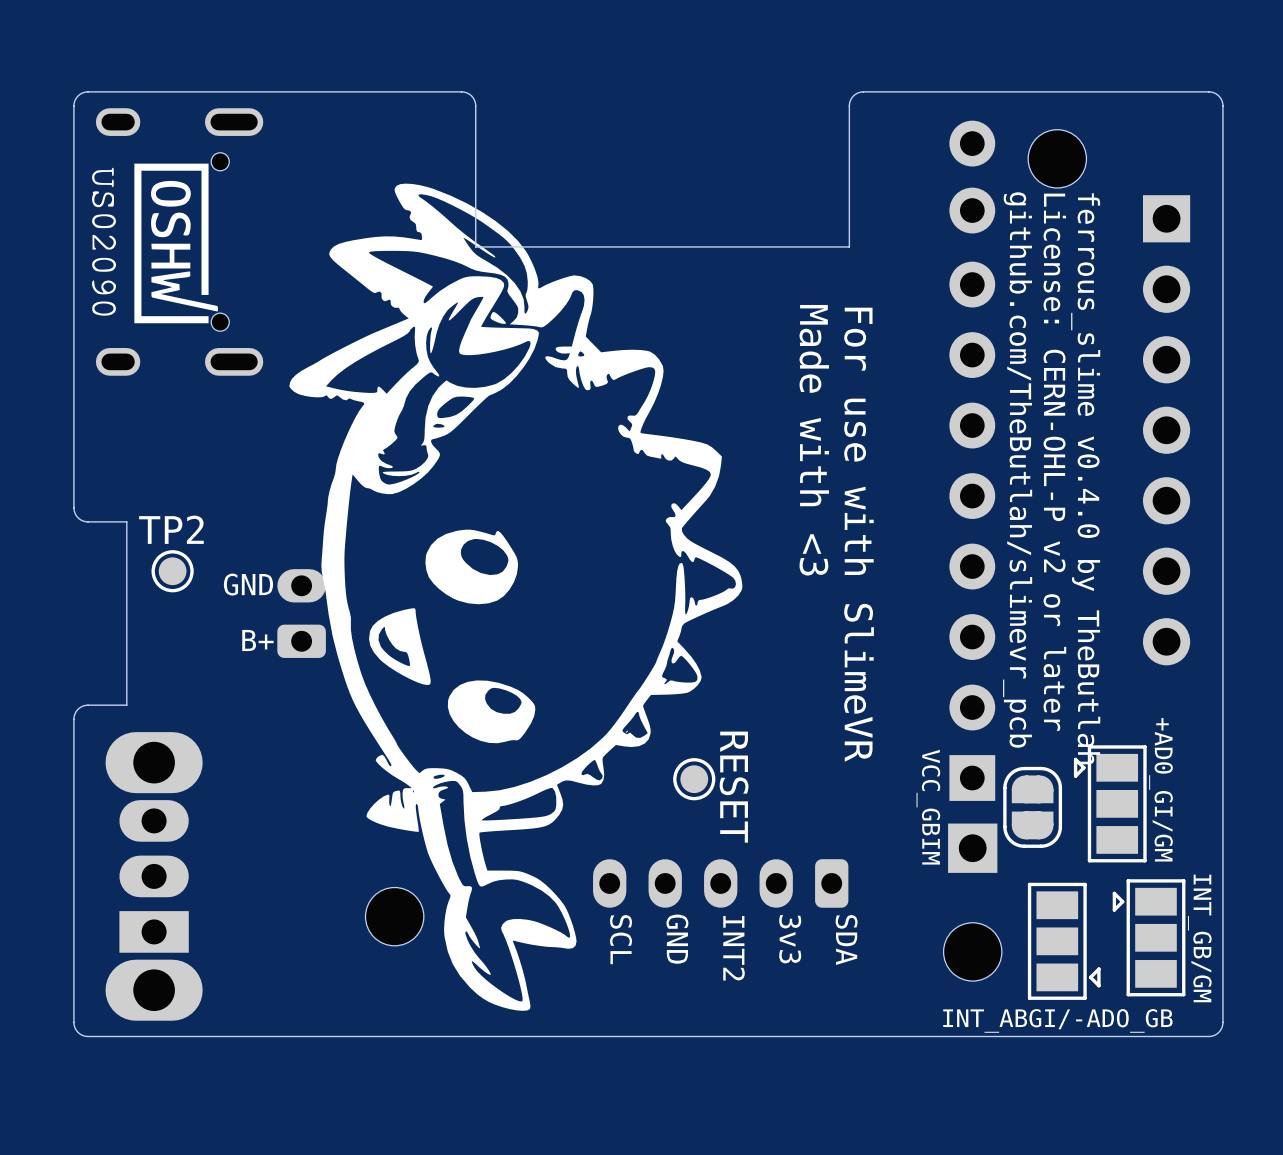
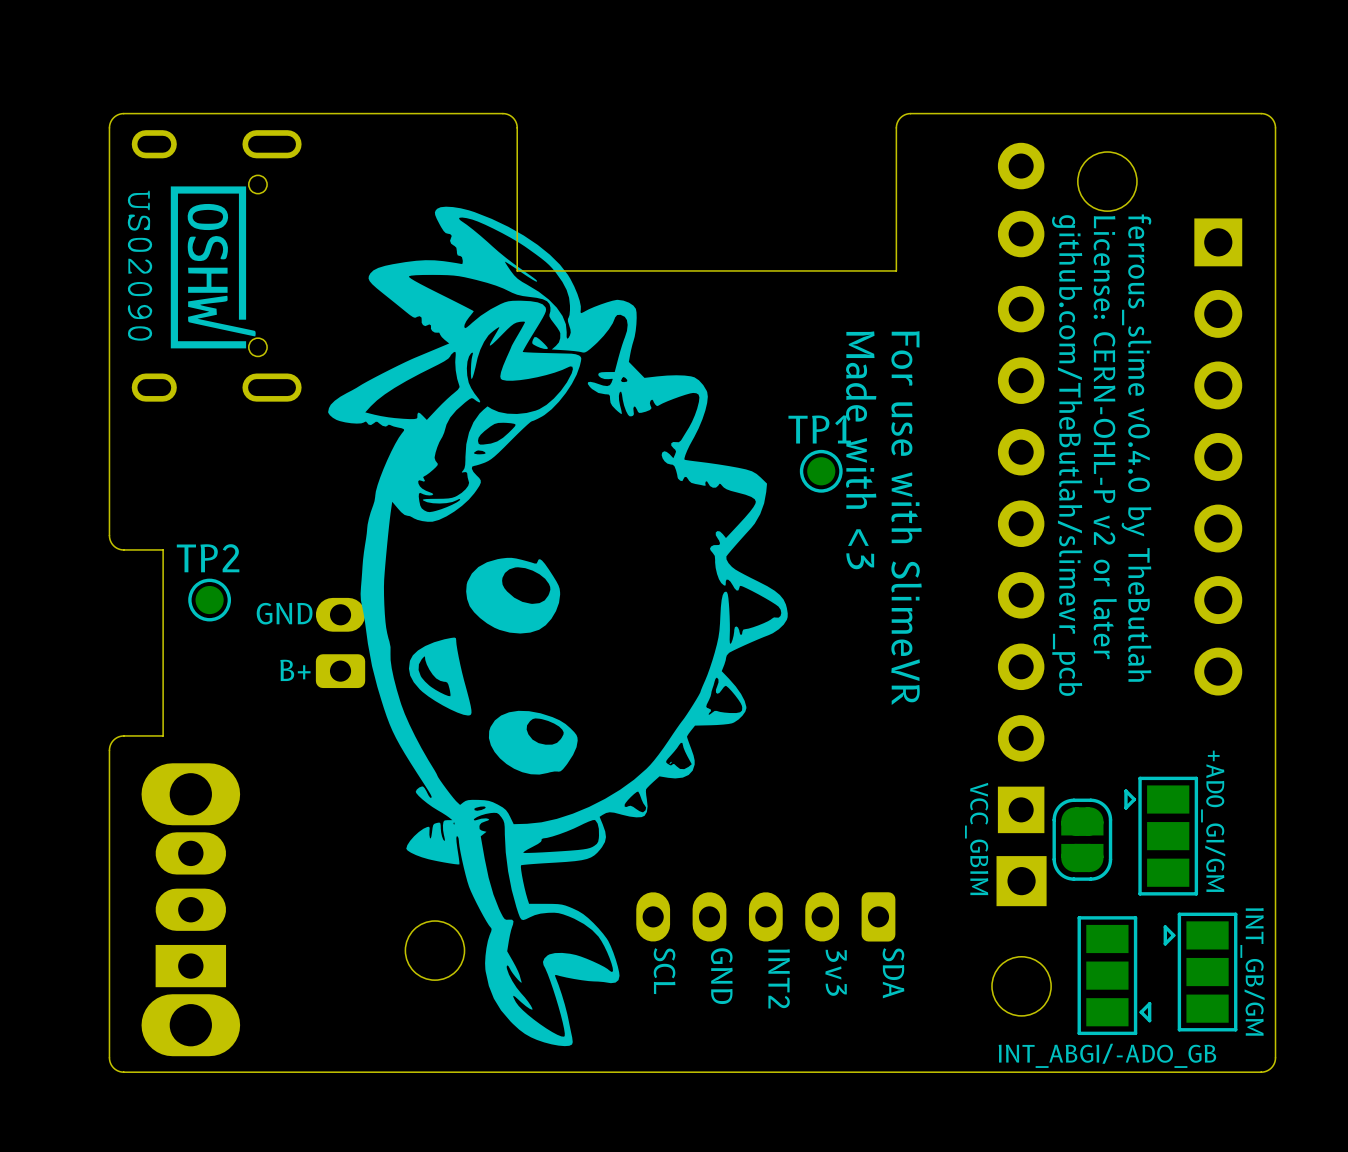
TP1: none -> (821, 471)
part: RESET (694, 779) -> none

